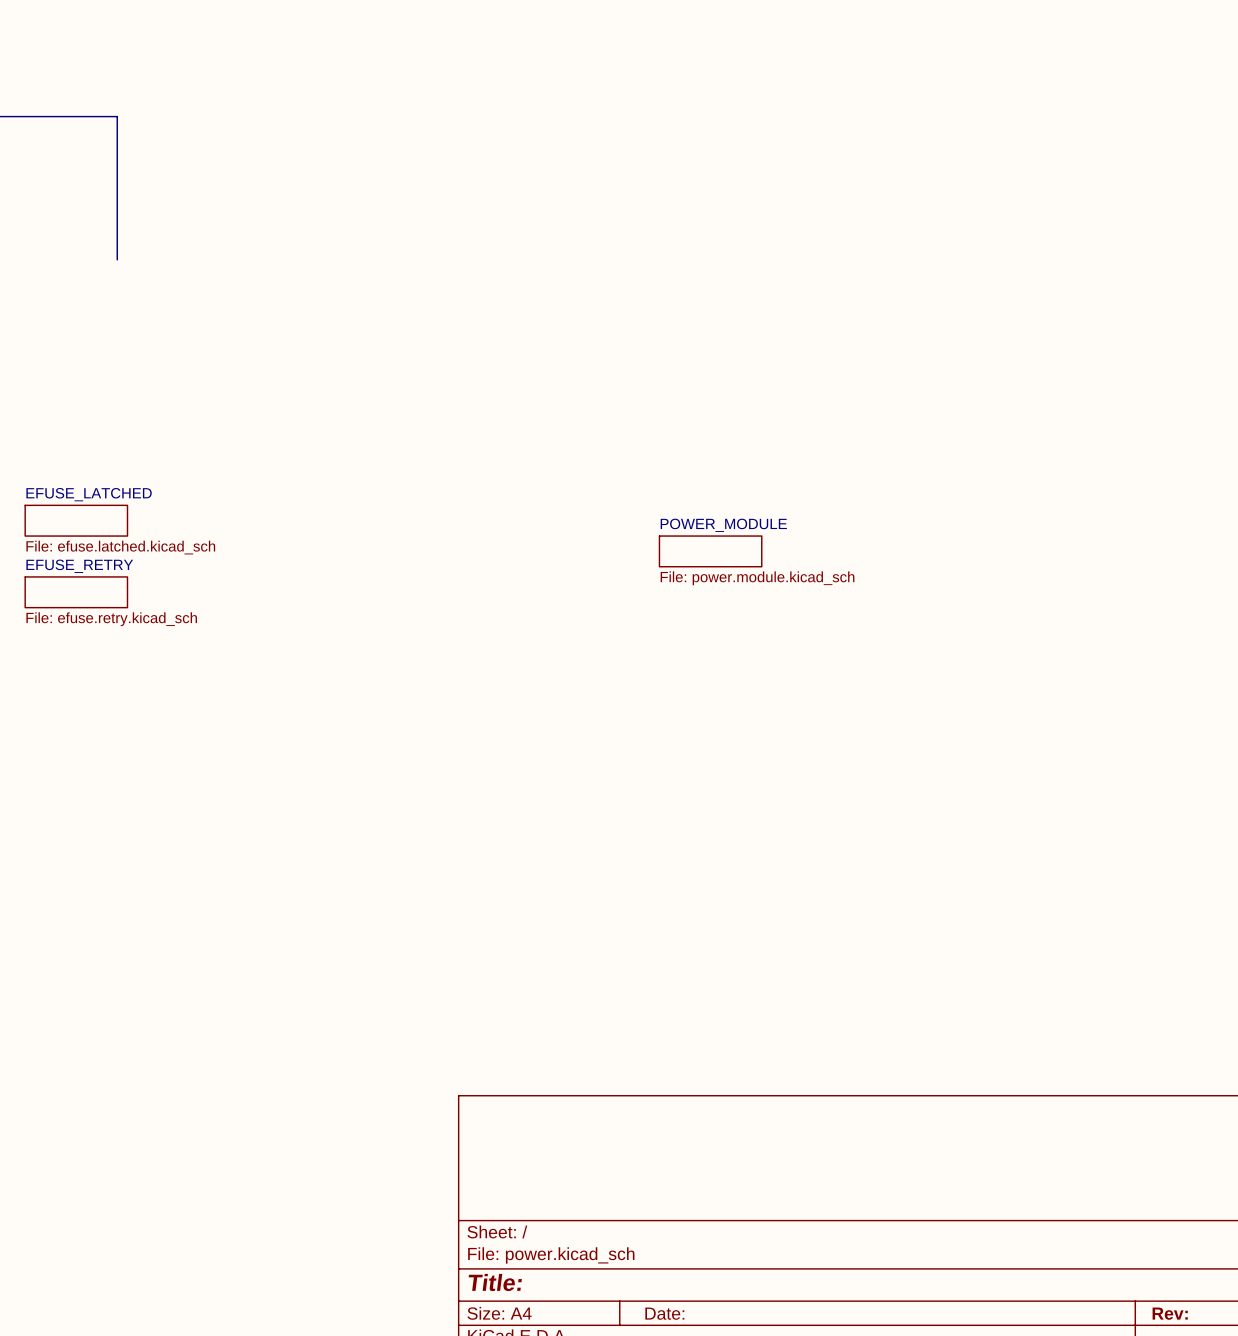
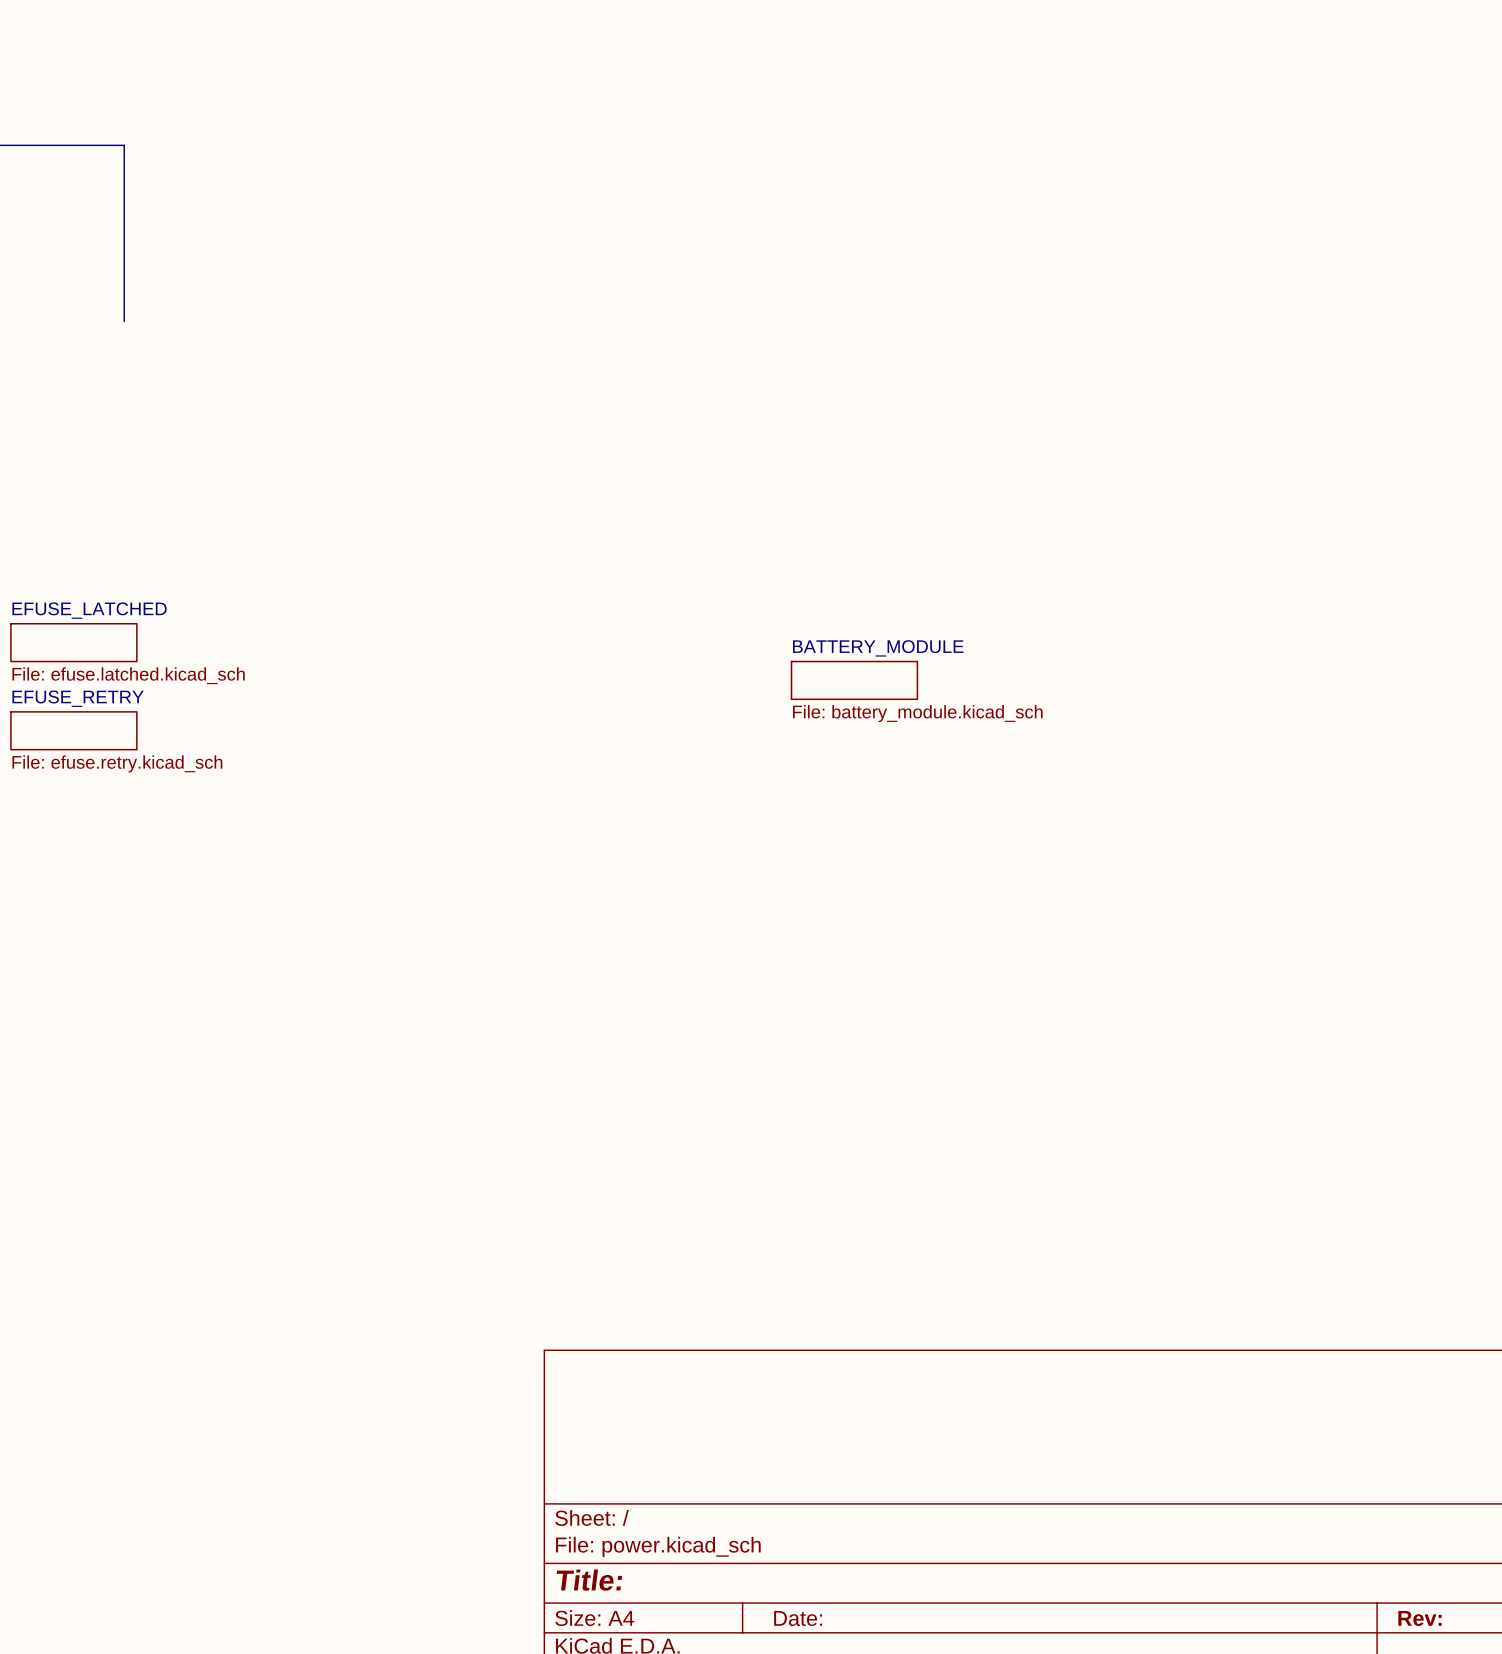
sheet POWER_MODULE name: POWER_MODULE (723, 525) -> BATTERY_MODULE (878, 648)
sheet POWER_MODULE value: File: power.module.kicad_sch (757, 578) -> File: battery_module.kicad_sch (917, 713)

